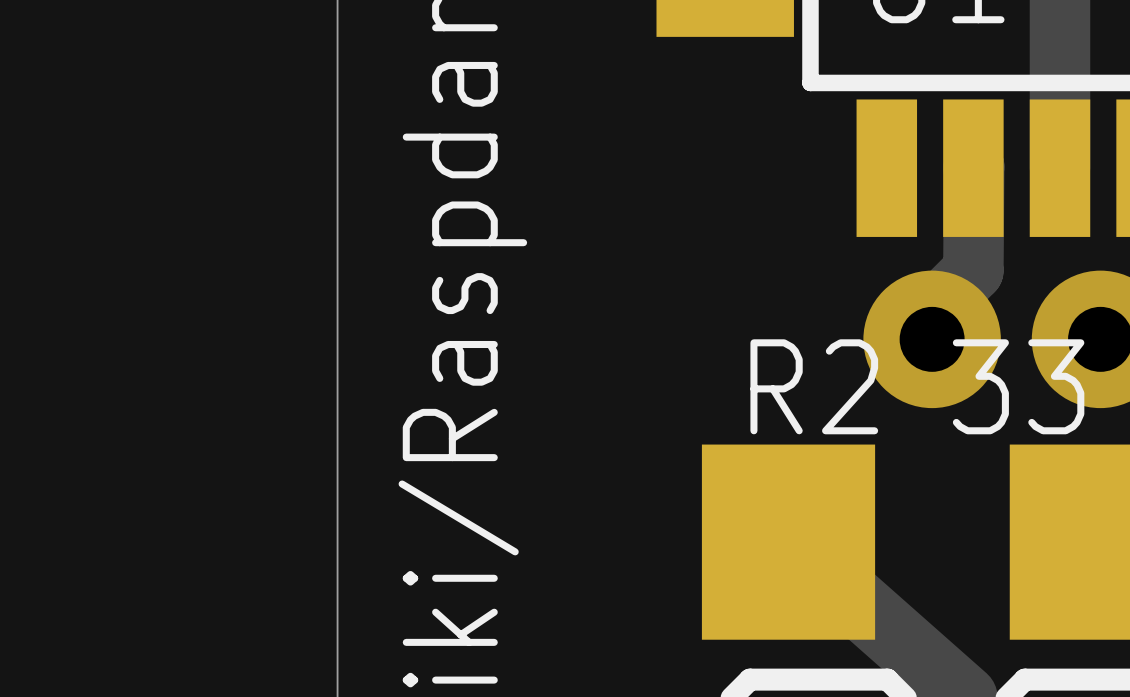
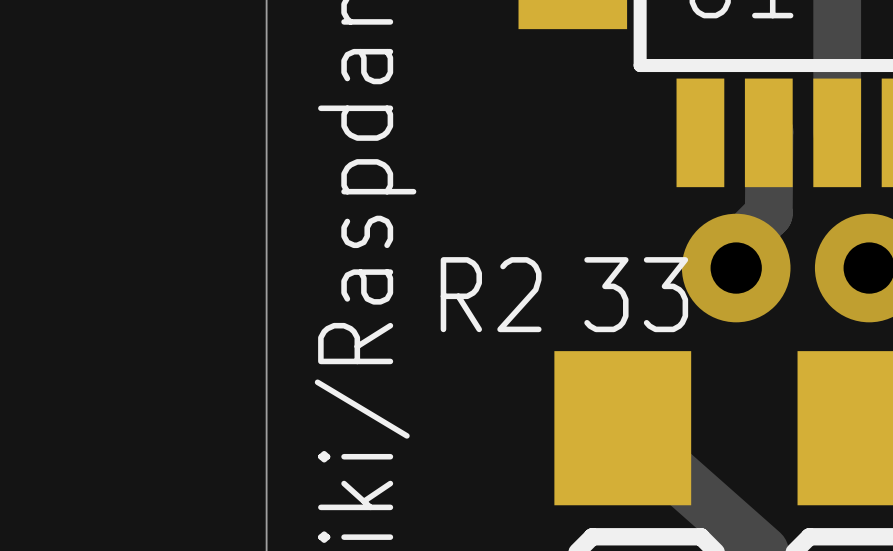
R2 name position: R2 (814, 386) -> R2 (491, 294)
R2 value position: 33 (1018, 386) -> 33 (636, 294)

